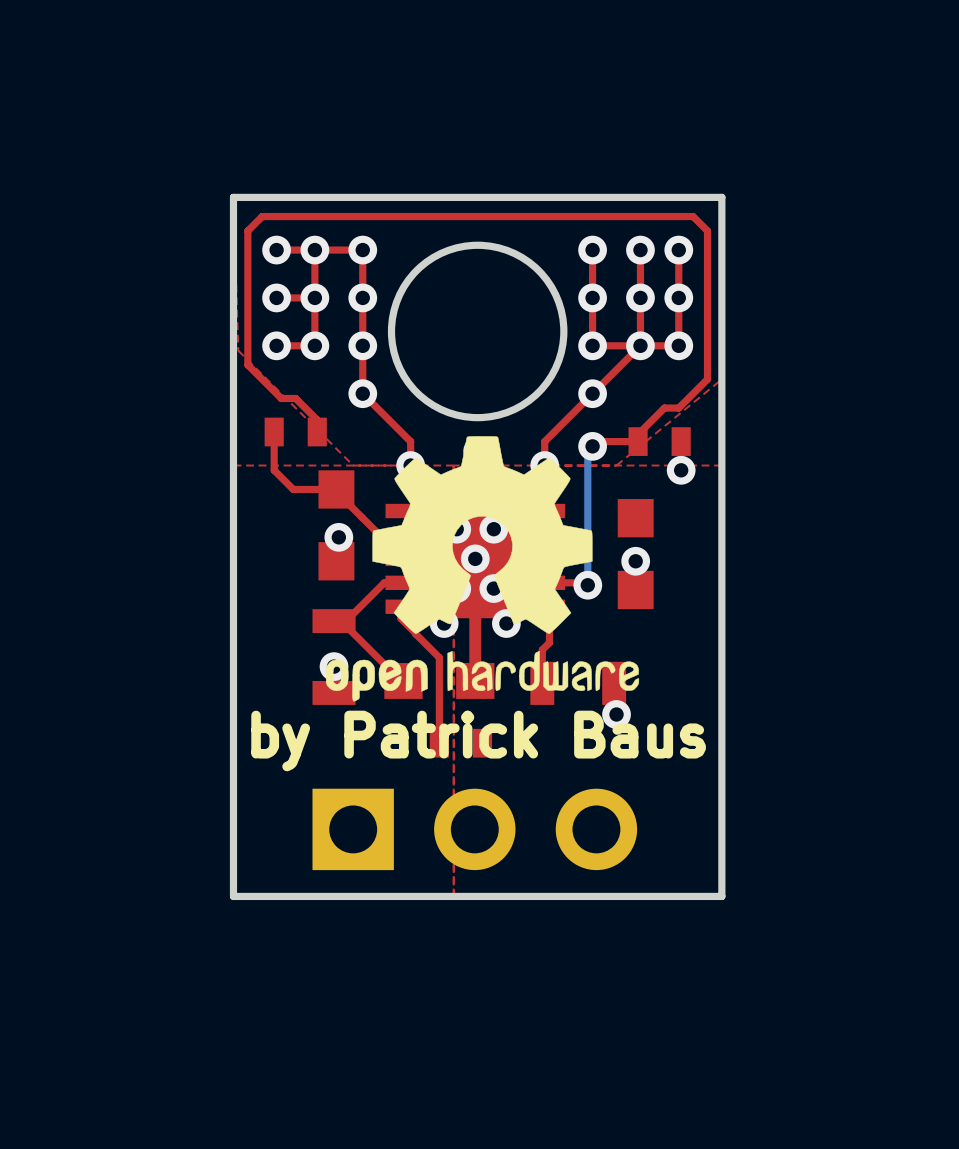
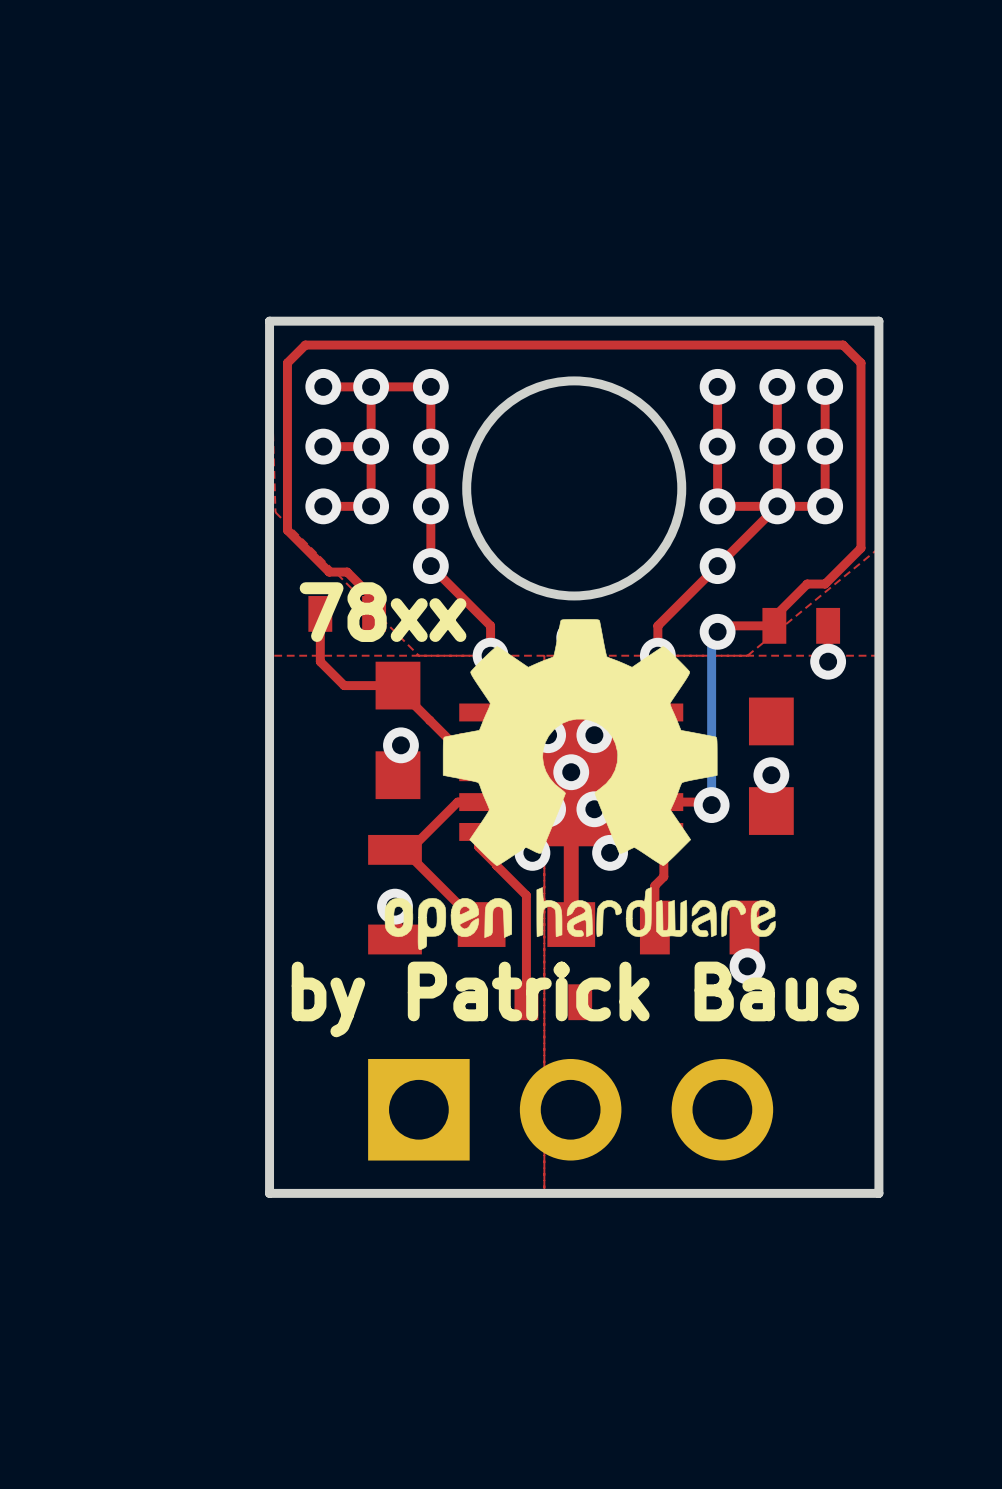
text: none -> 78xx (383, 612)

